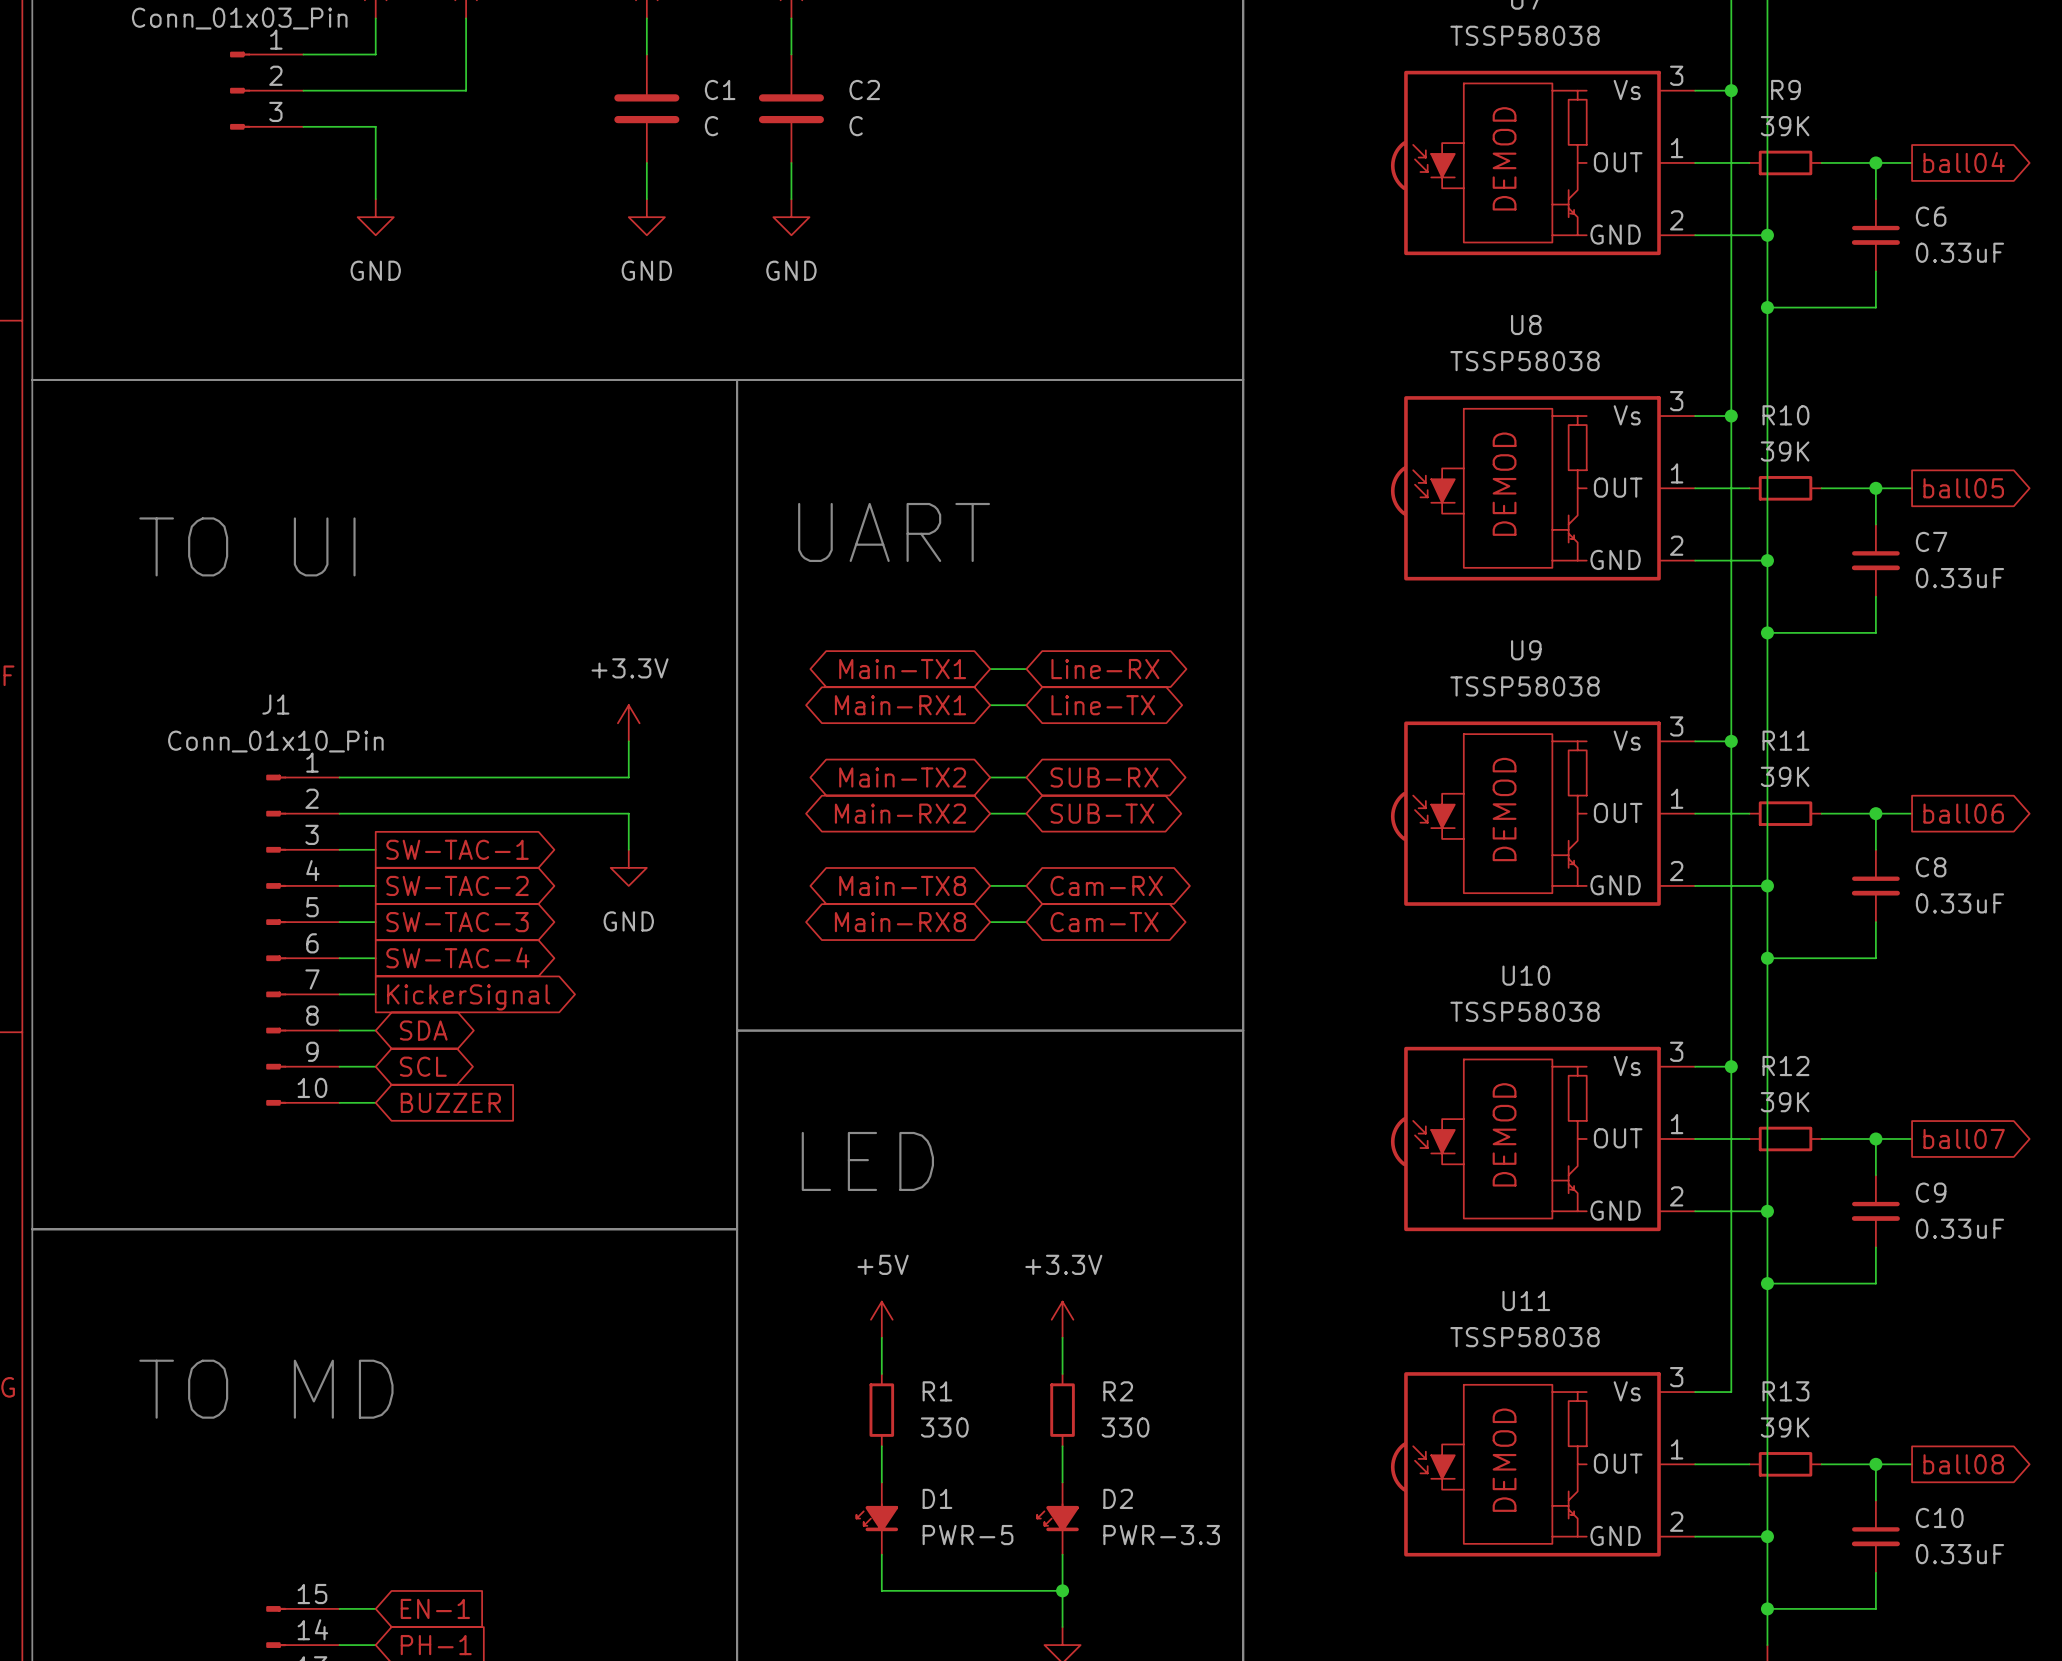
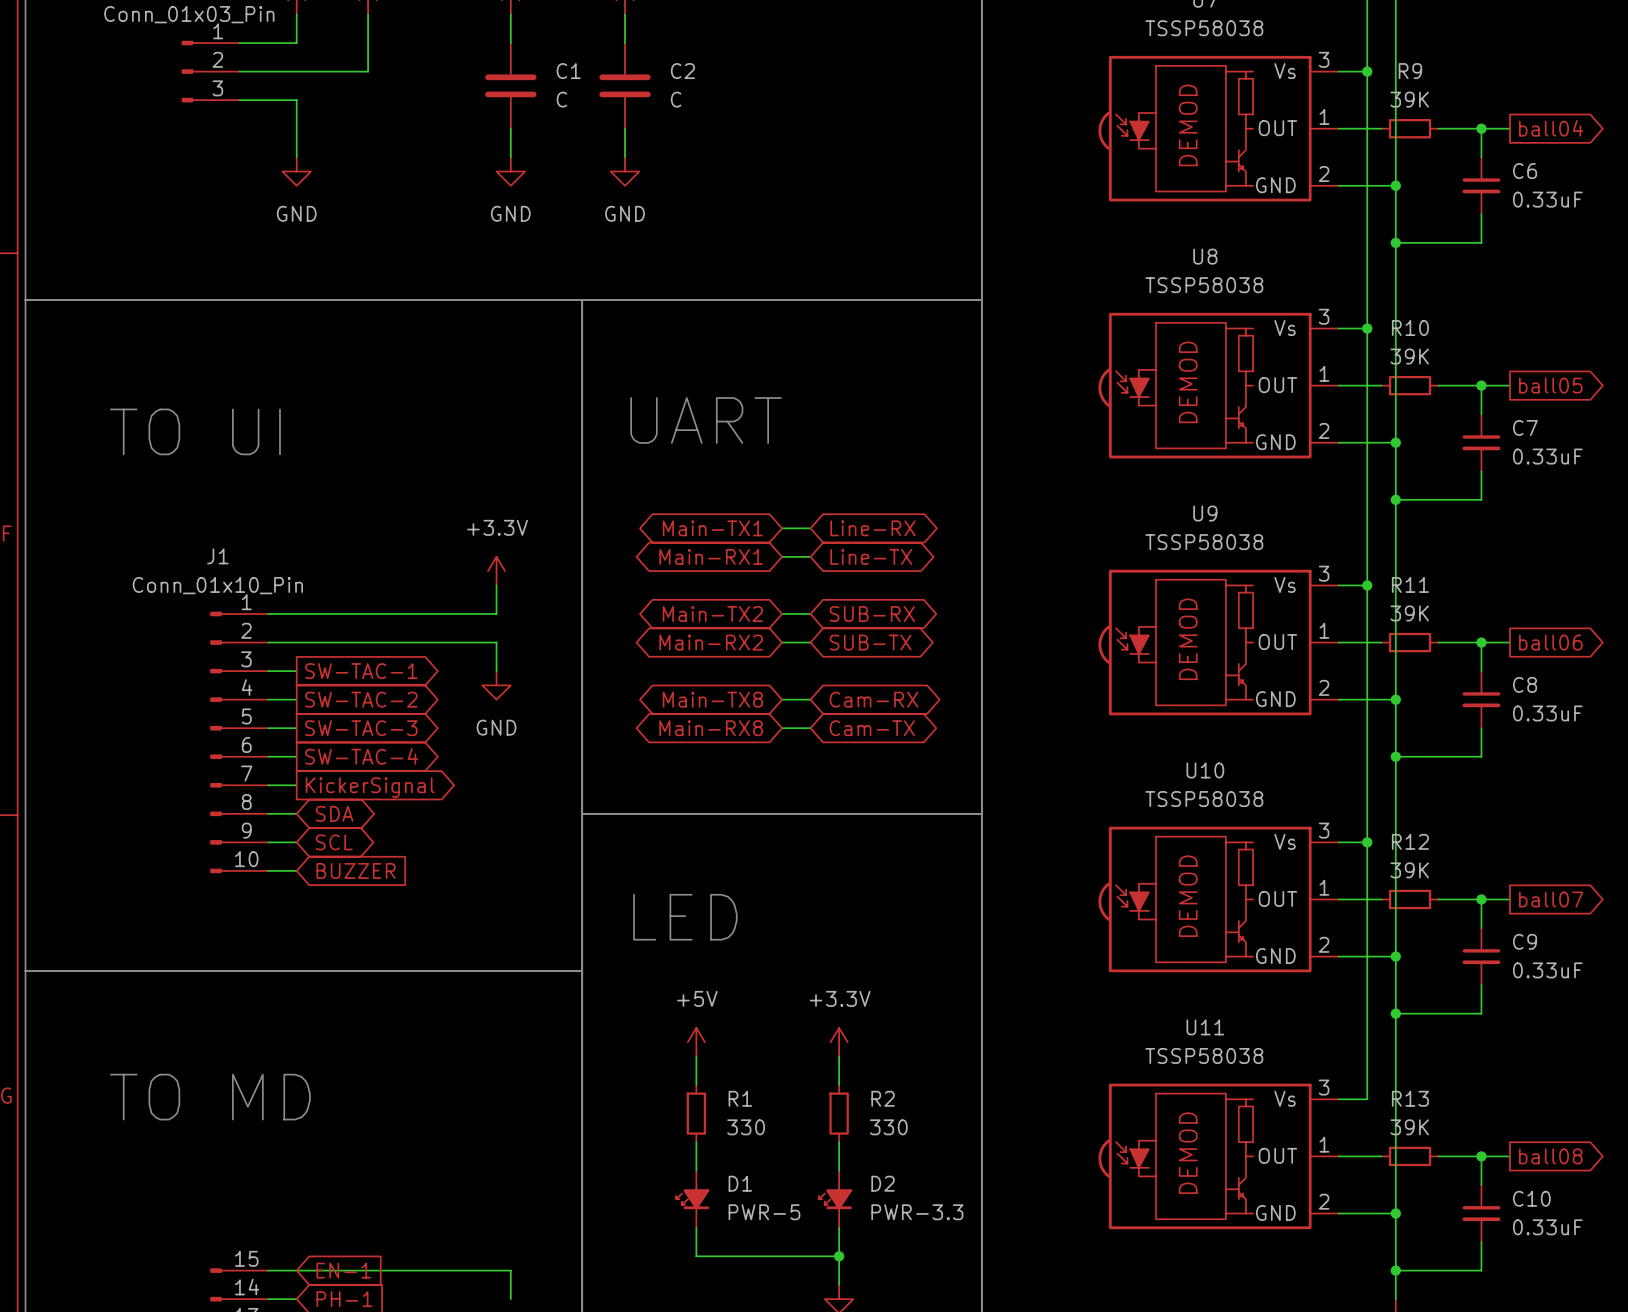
wire: none -> (296, 1270) (510, 1270) (510, 1299)

